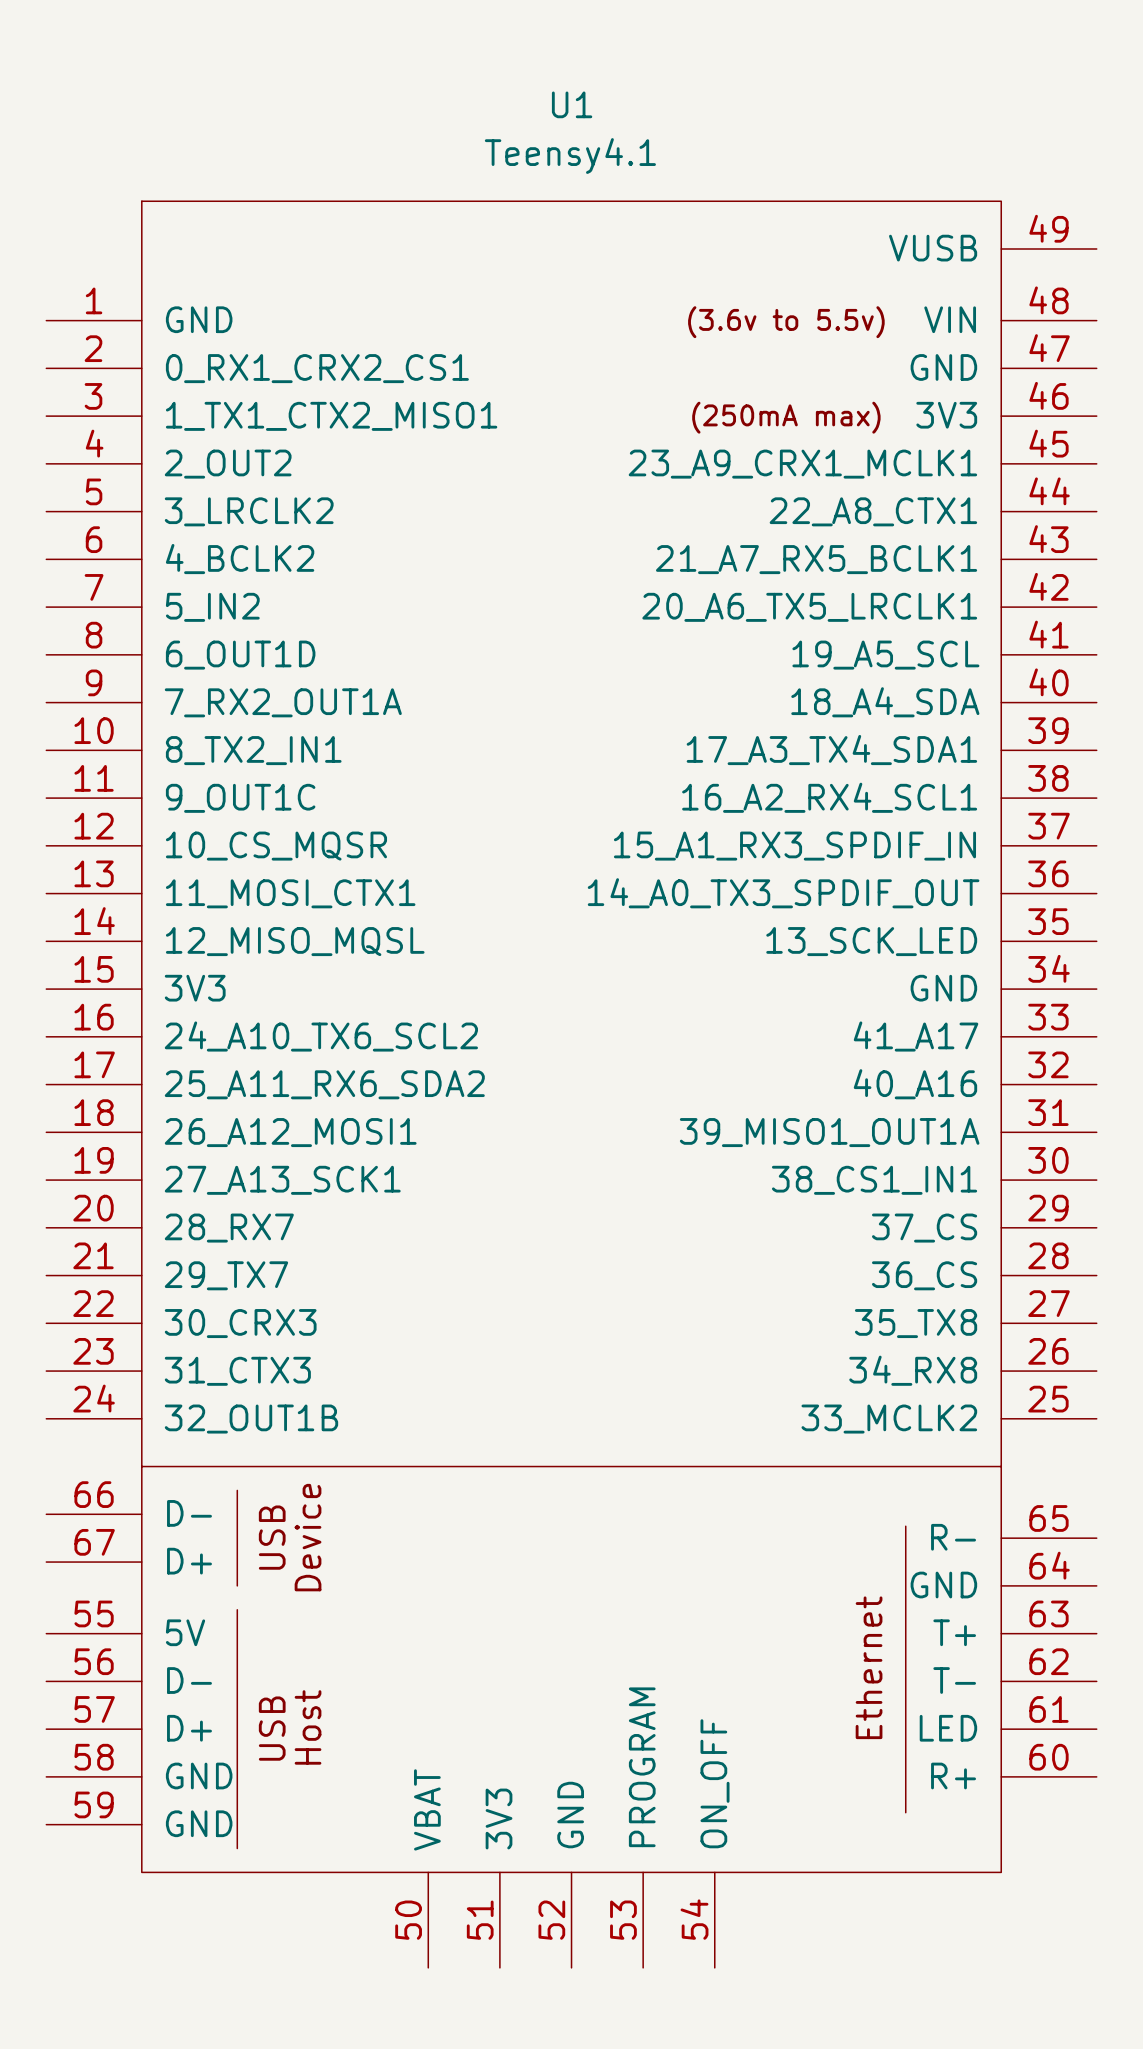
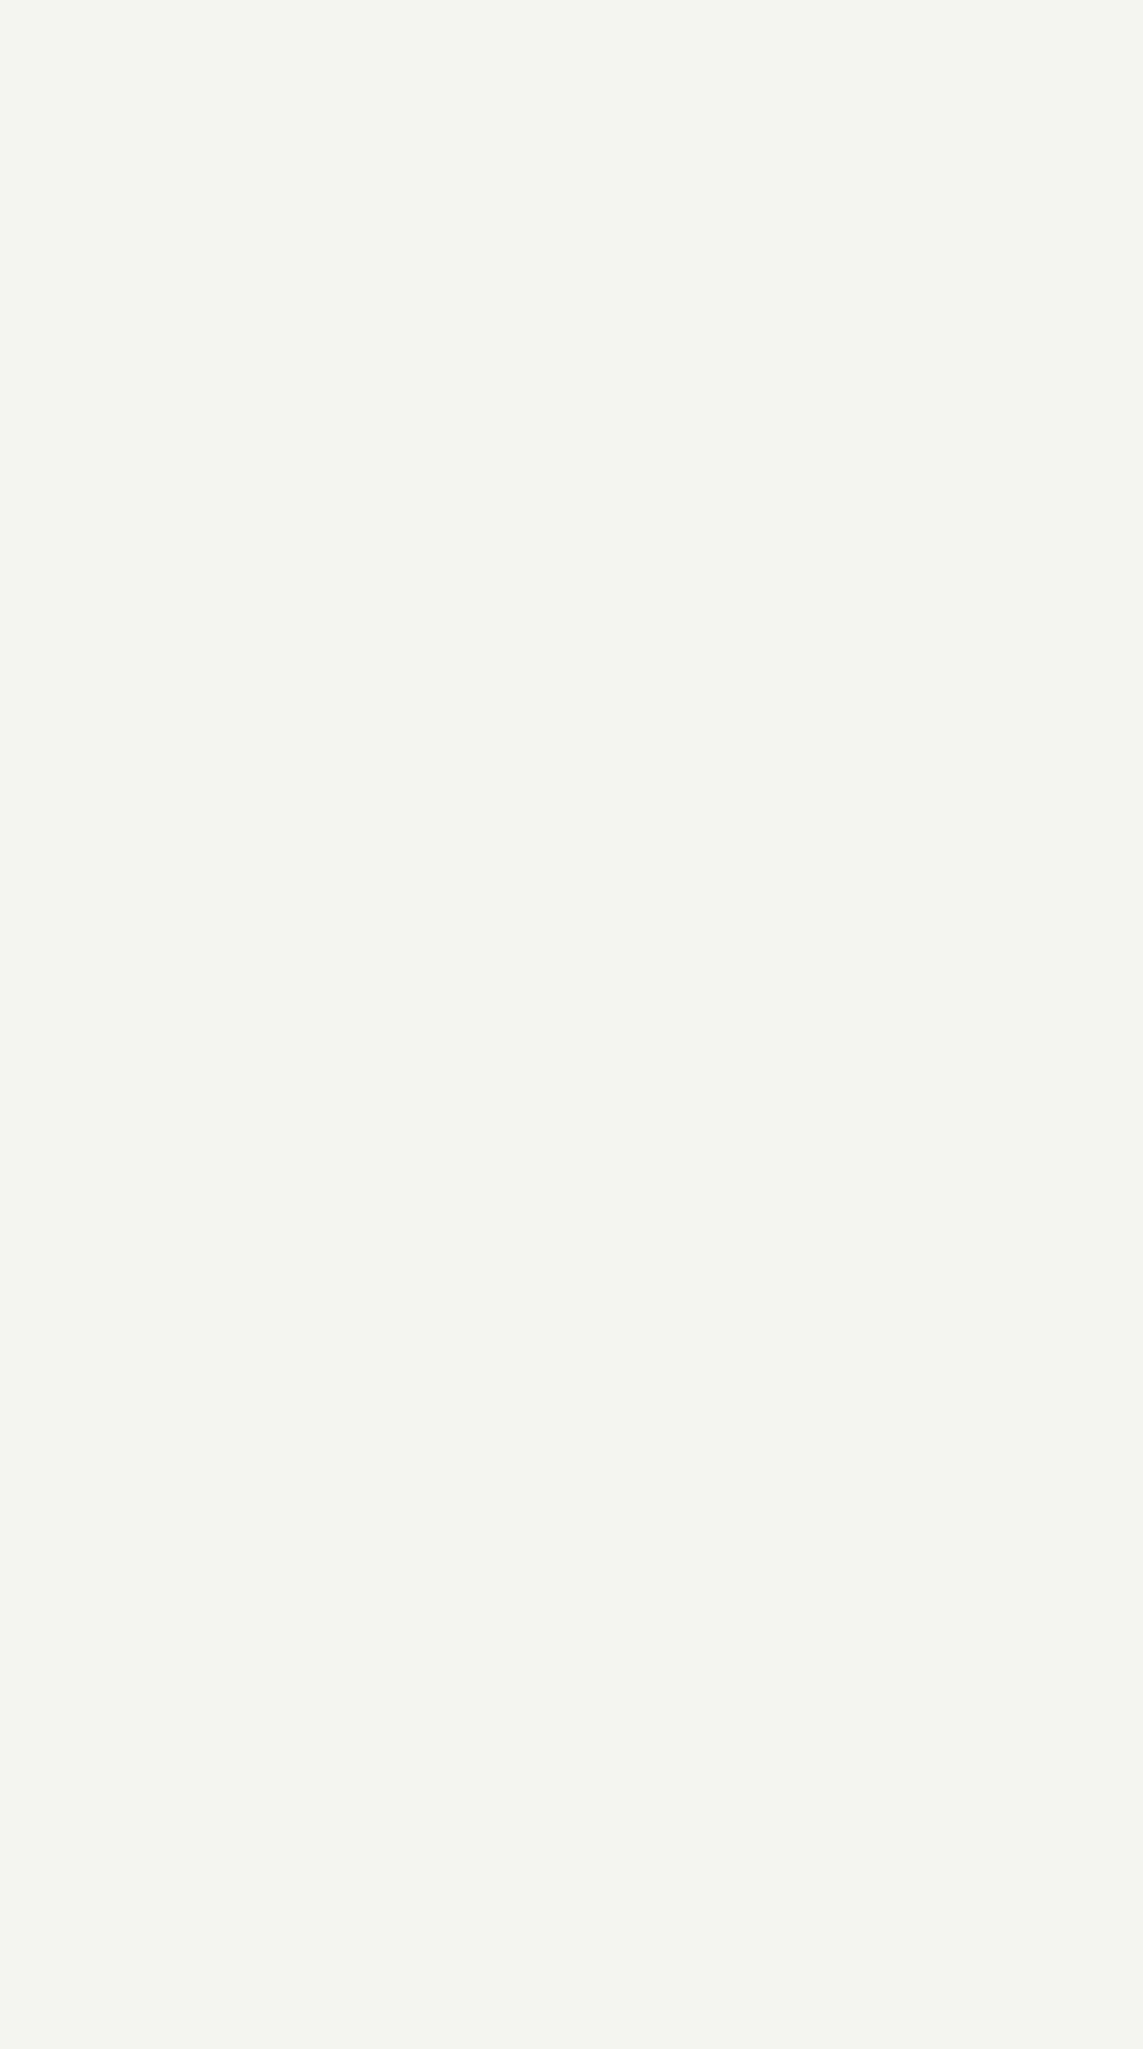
U1: Teensy4.1 (571, 1084) -> none

